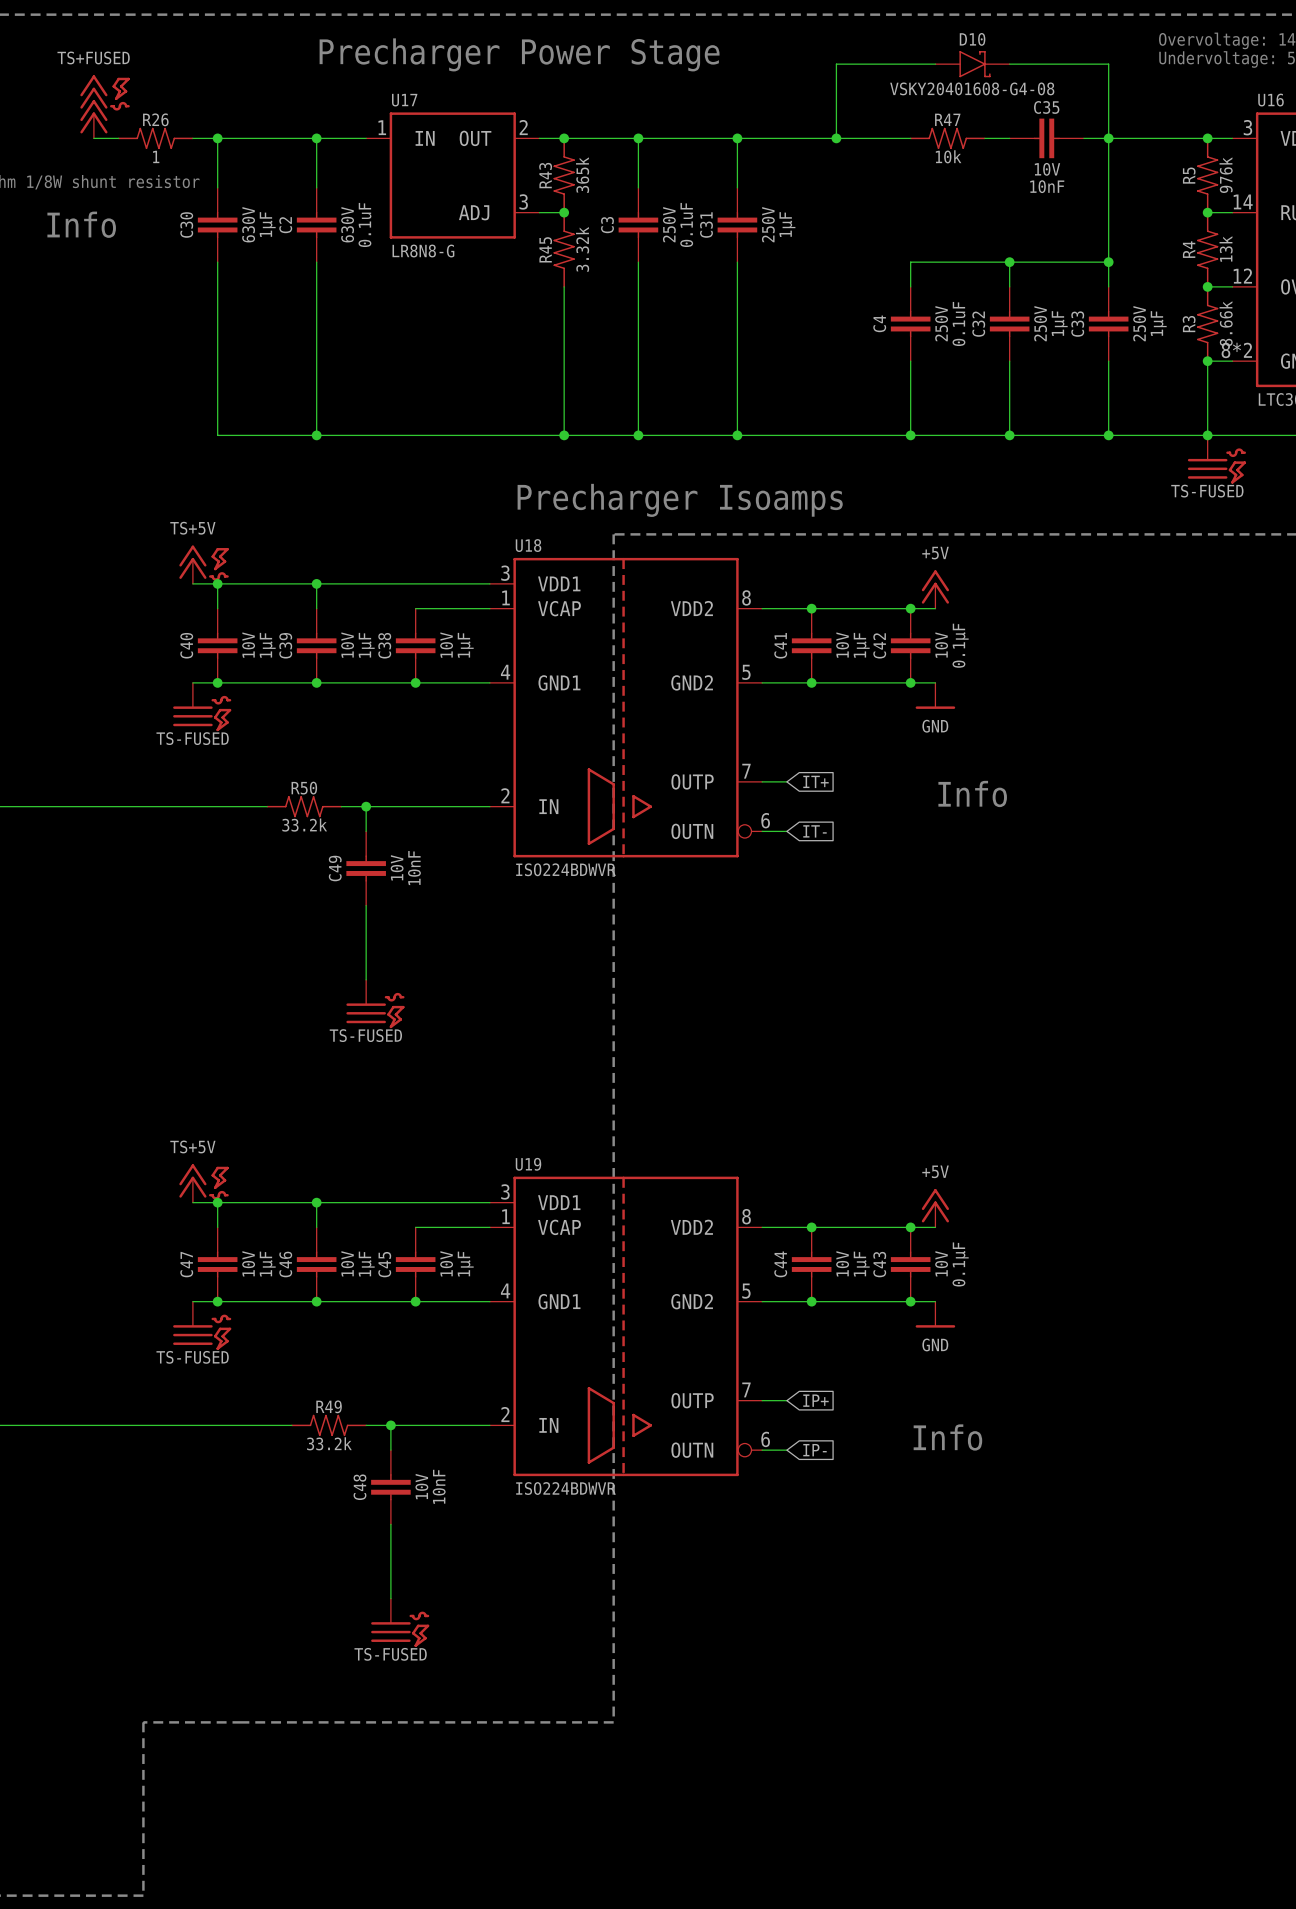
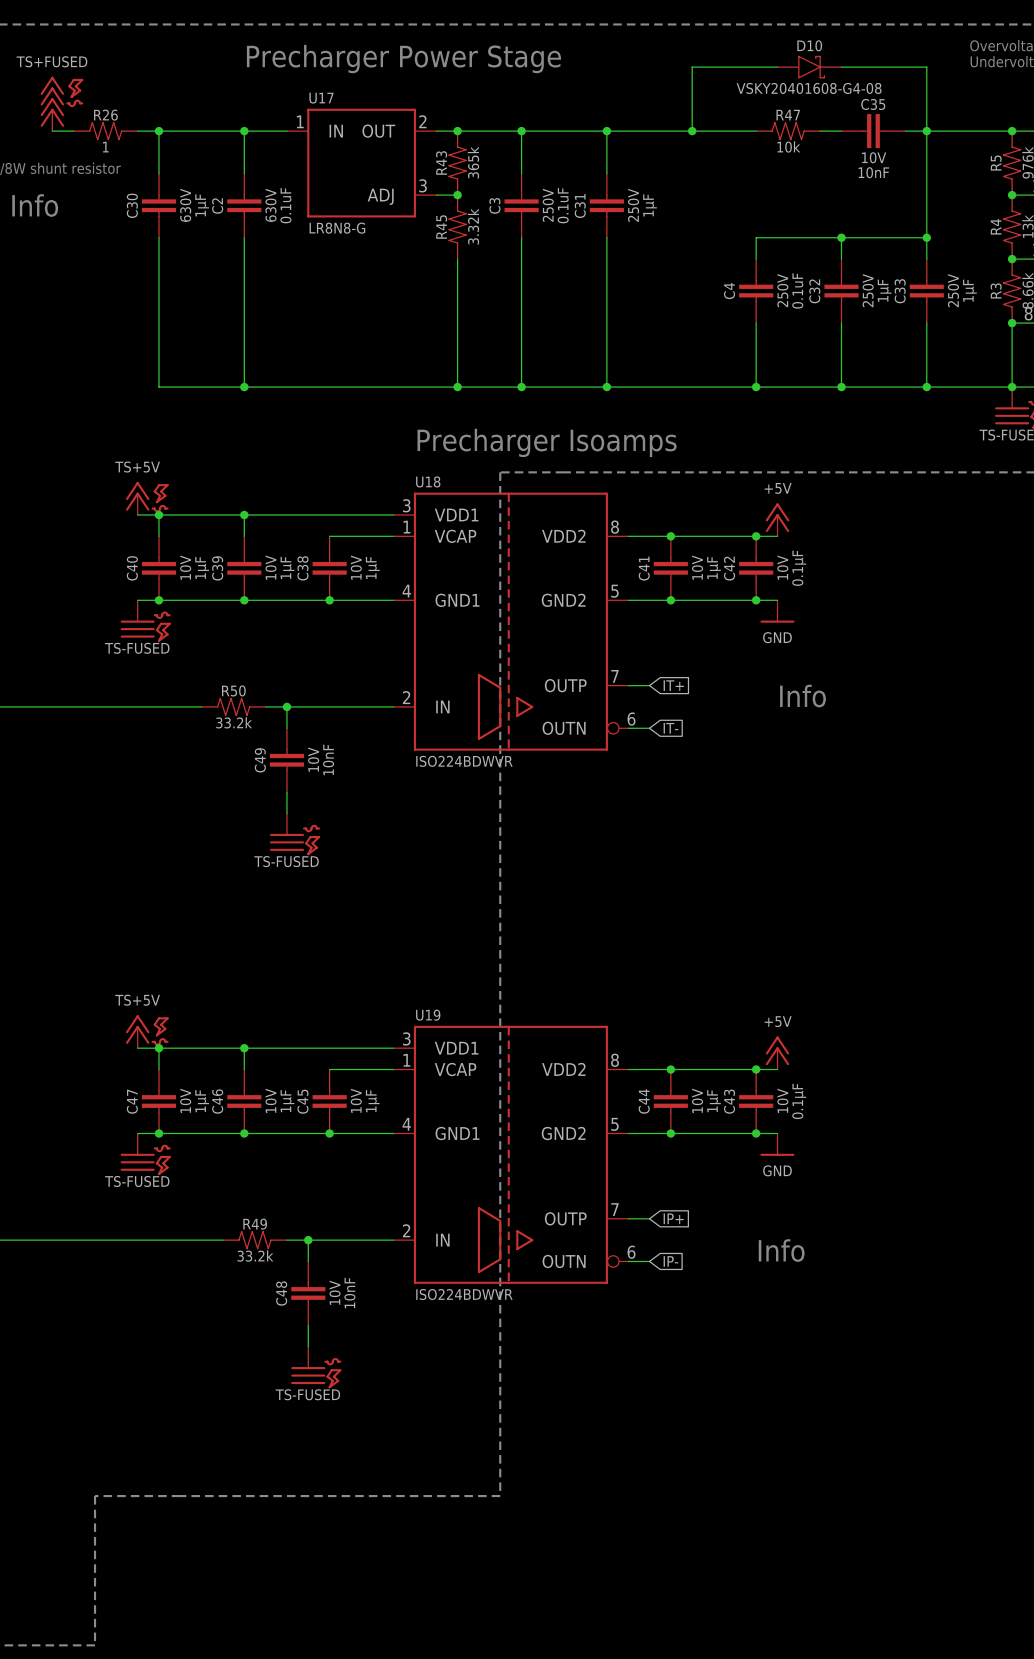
power symbol position: TS-FUSED (375, 1004) -> TS-FUSED (294, 834)
power symbol position: TS-FUSED (400, 1622) -> TS-FUSED (316, 1367)

